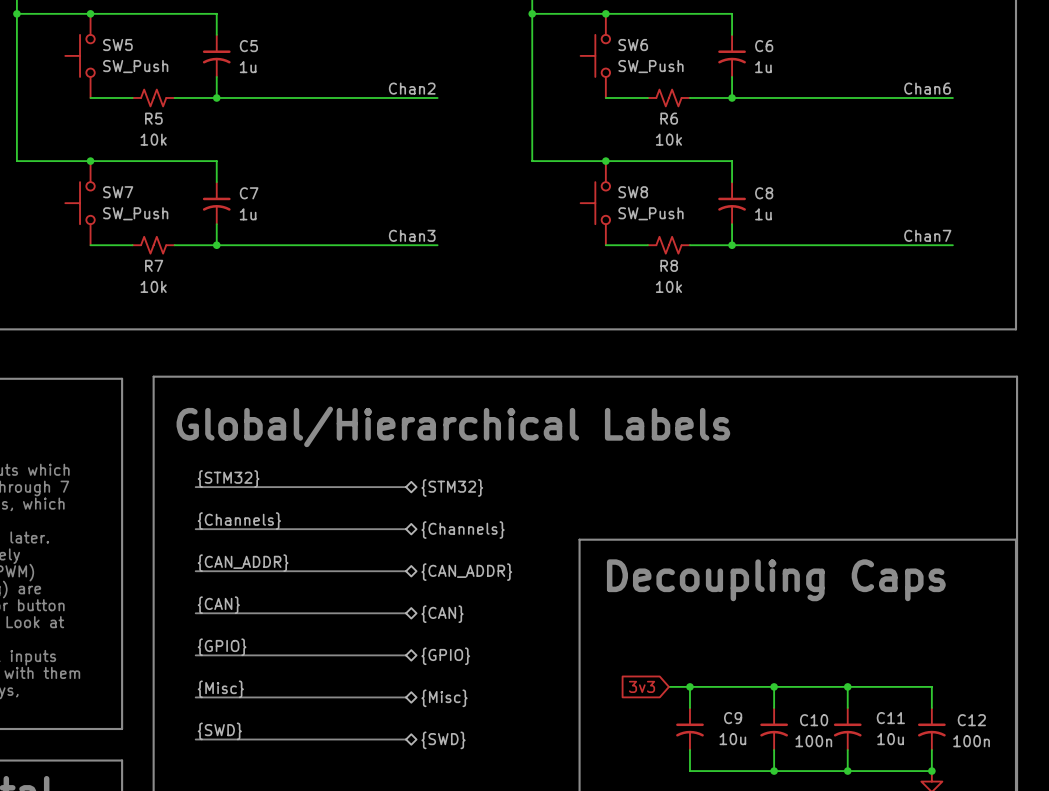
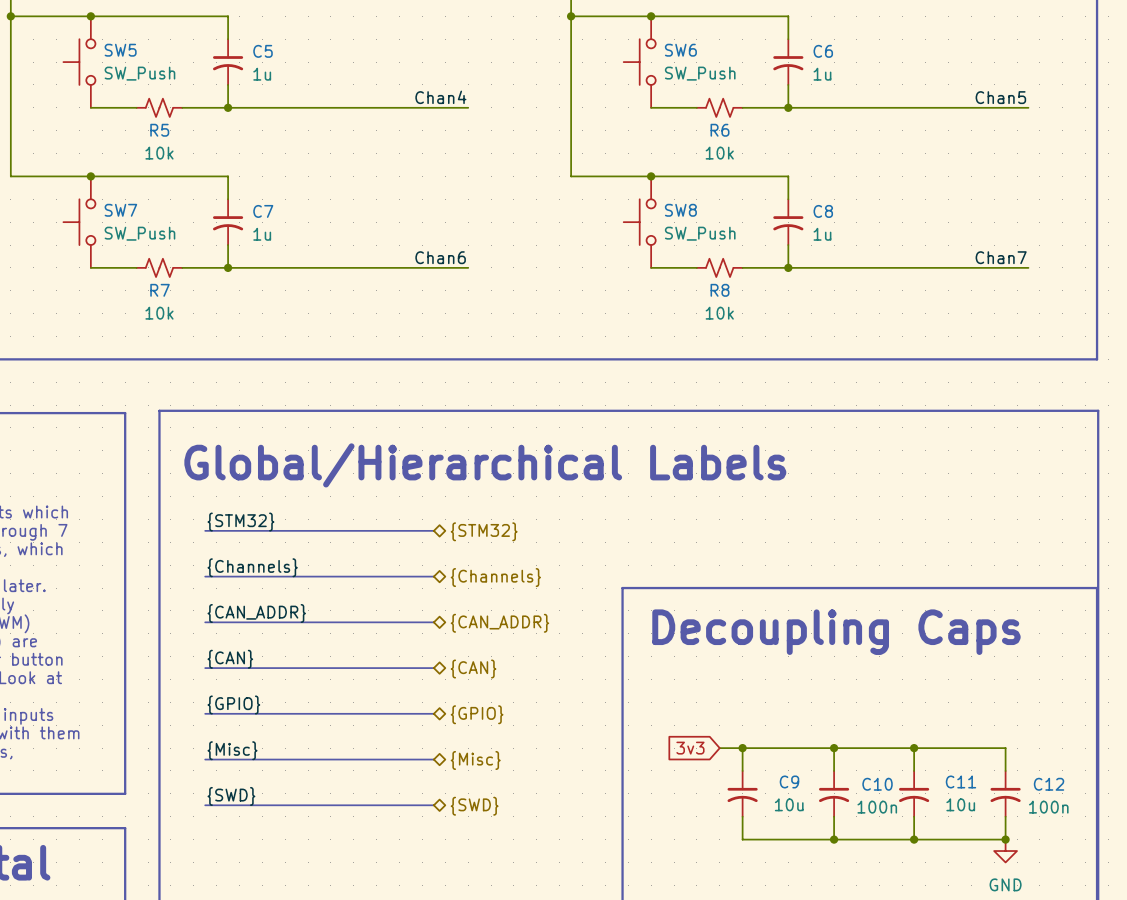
label: Chan2 (412, 88) -> Chan4 (440, 97)
label: Chan6 (927, 88) -> Chan5 (1000, 97)
label: Chan3 (412, 235) -> Chan6 (440, 257)

